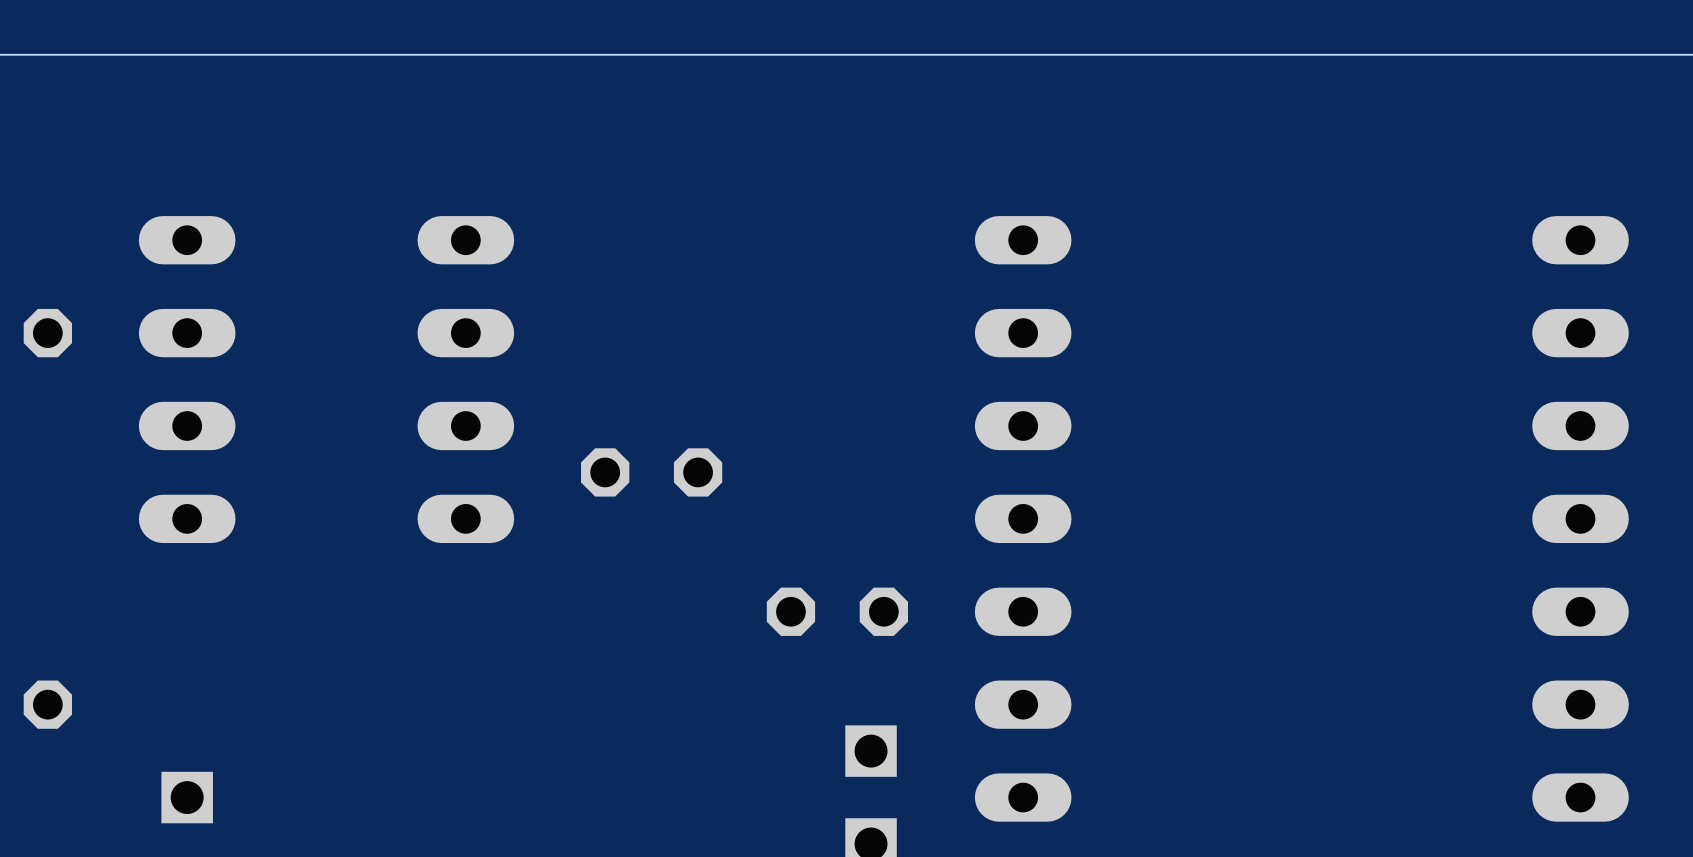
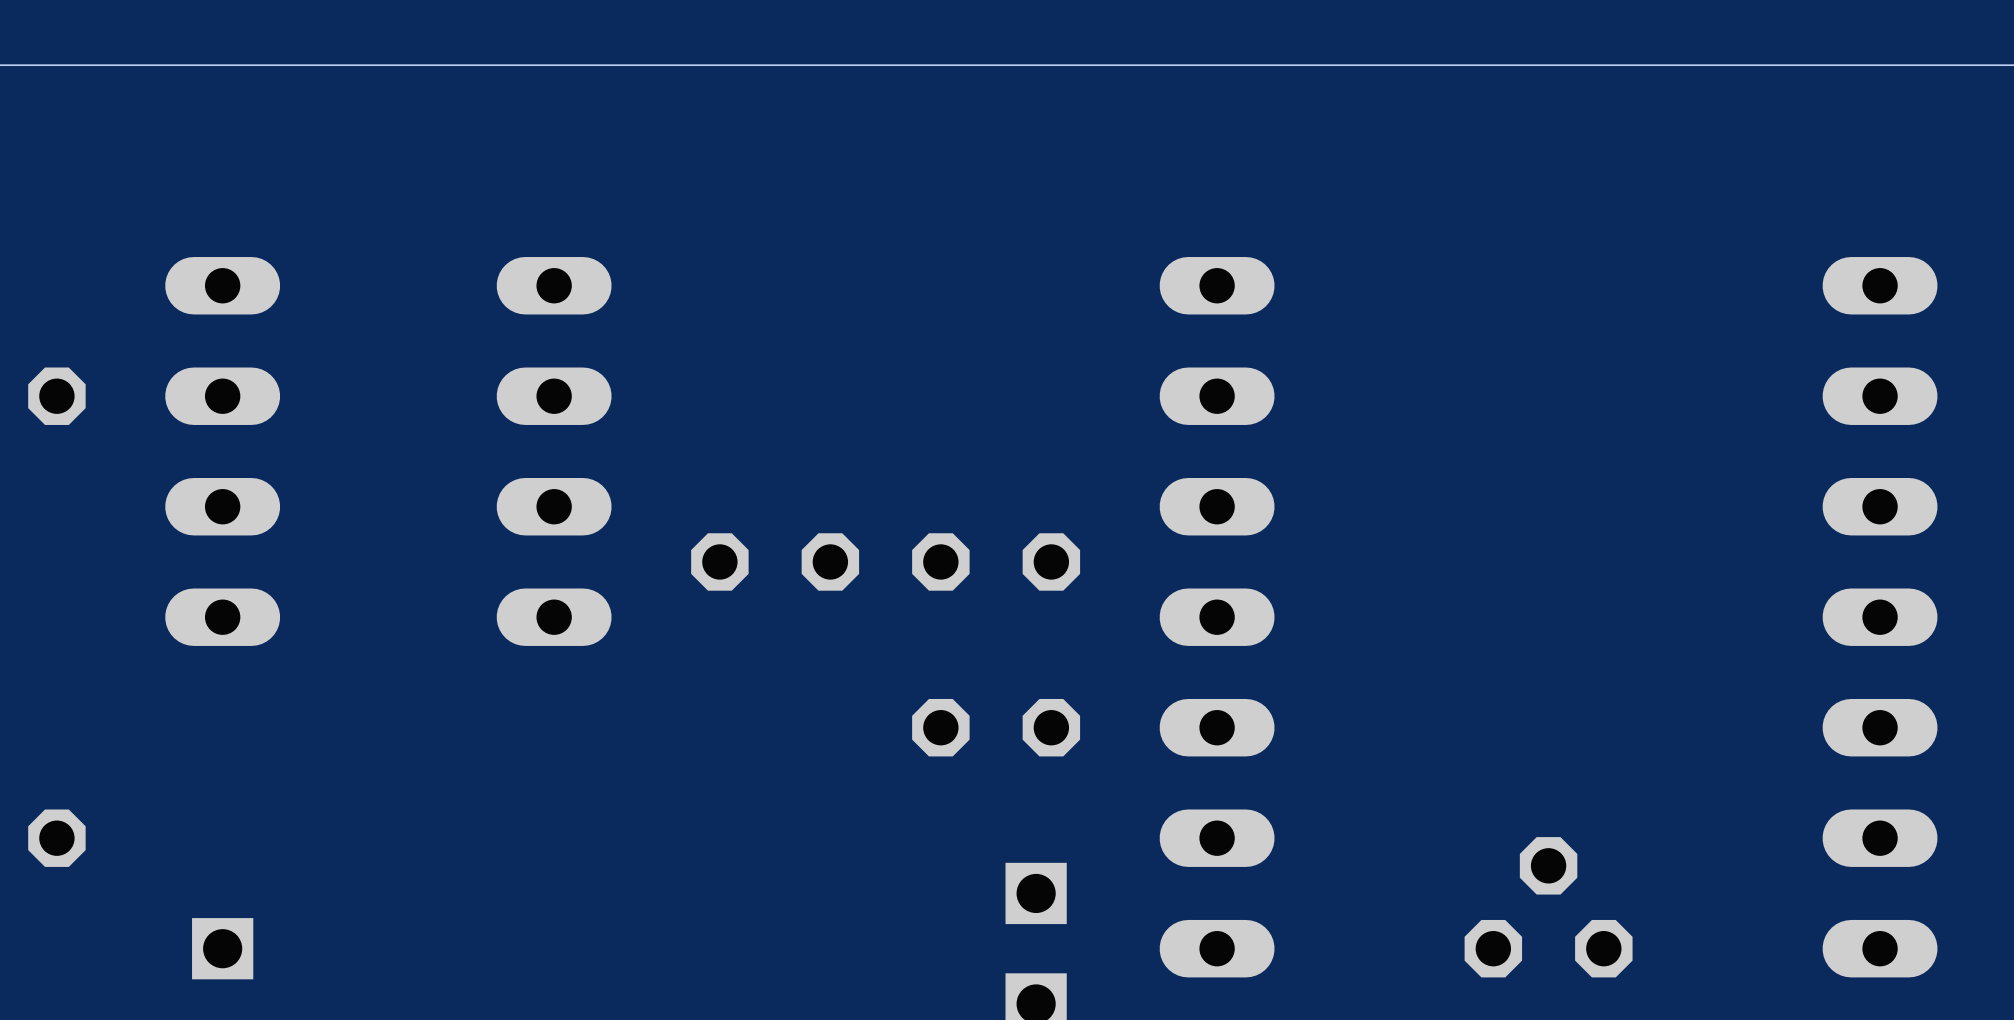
part: none -> (996, 561)
part: none -> (1548, 907)

